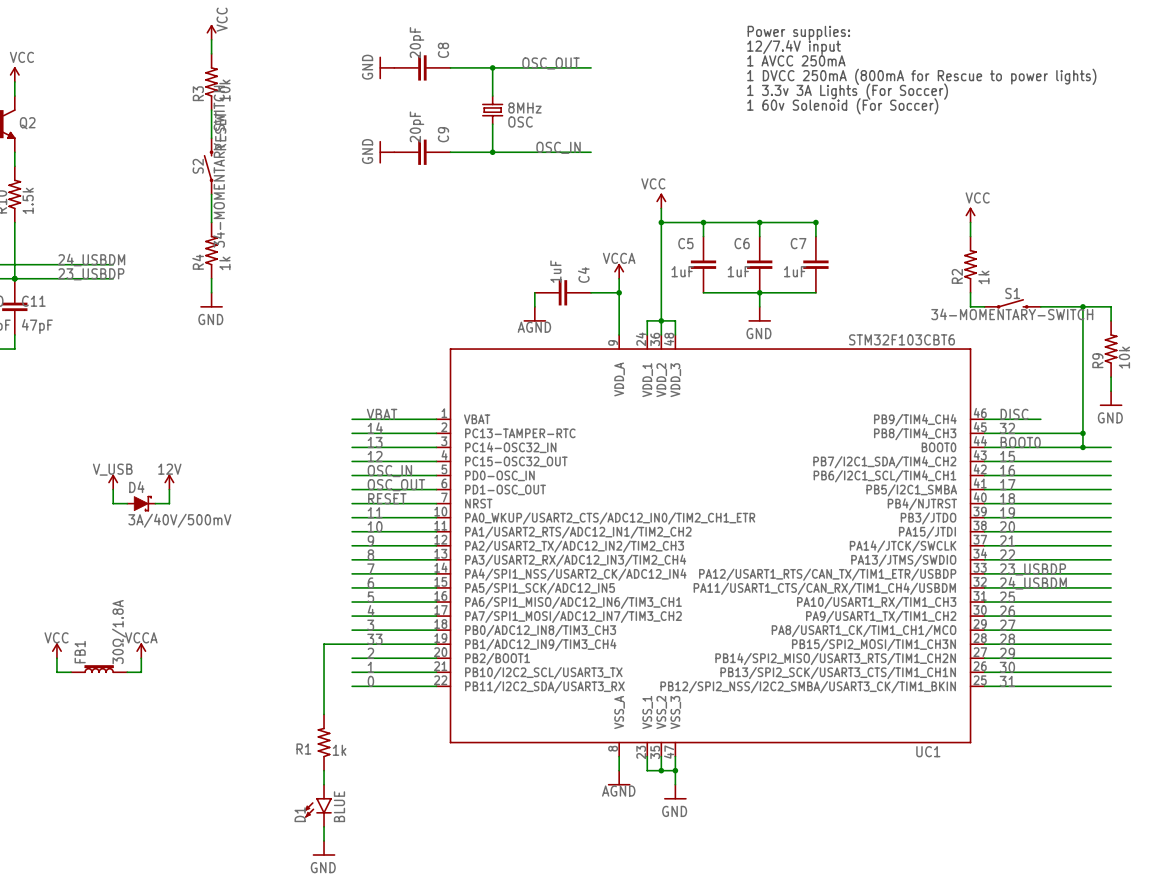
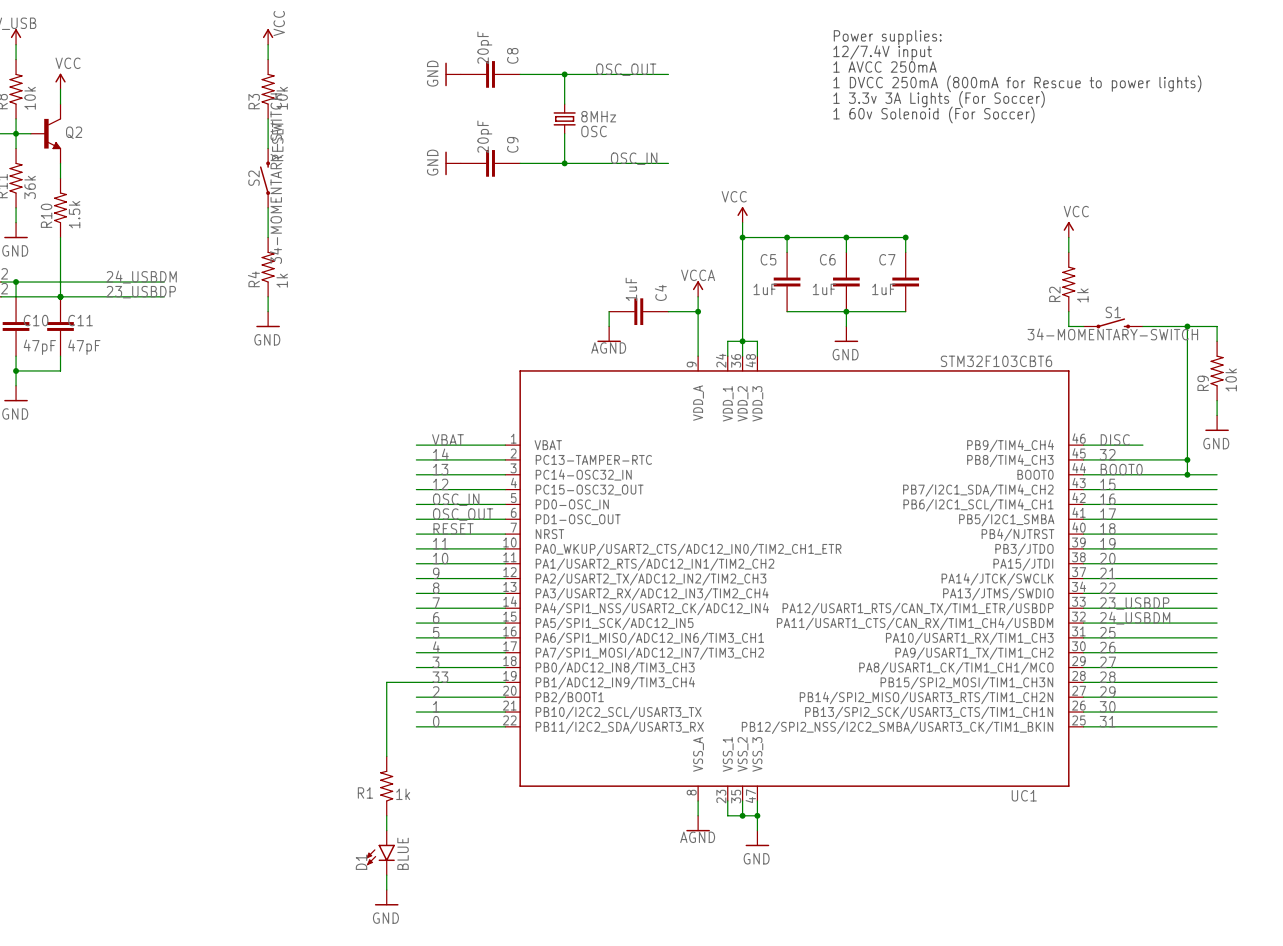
power symbol: V_USB (113, 482) -> none
power symbol: 12V (169, 482) -> none
wire: (113, 489) (113, 503) (127, 503) -> none
wire: (169, 489) (169, 503) (155, 503) -> none
D4: 3A/40V/500mV (141, 503) -> none
power symbol: VCC (56, 650) -> none
power symbol: VCCA (141, 650) -> none
wire: (56, 658) (56, 672) (71, 672) -> none
wire: (141, 658) (141, 672) (127, 672) -> none
FB1: 30Ω/1.8A (99, 669) -> none

